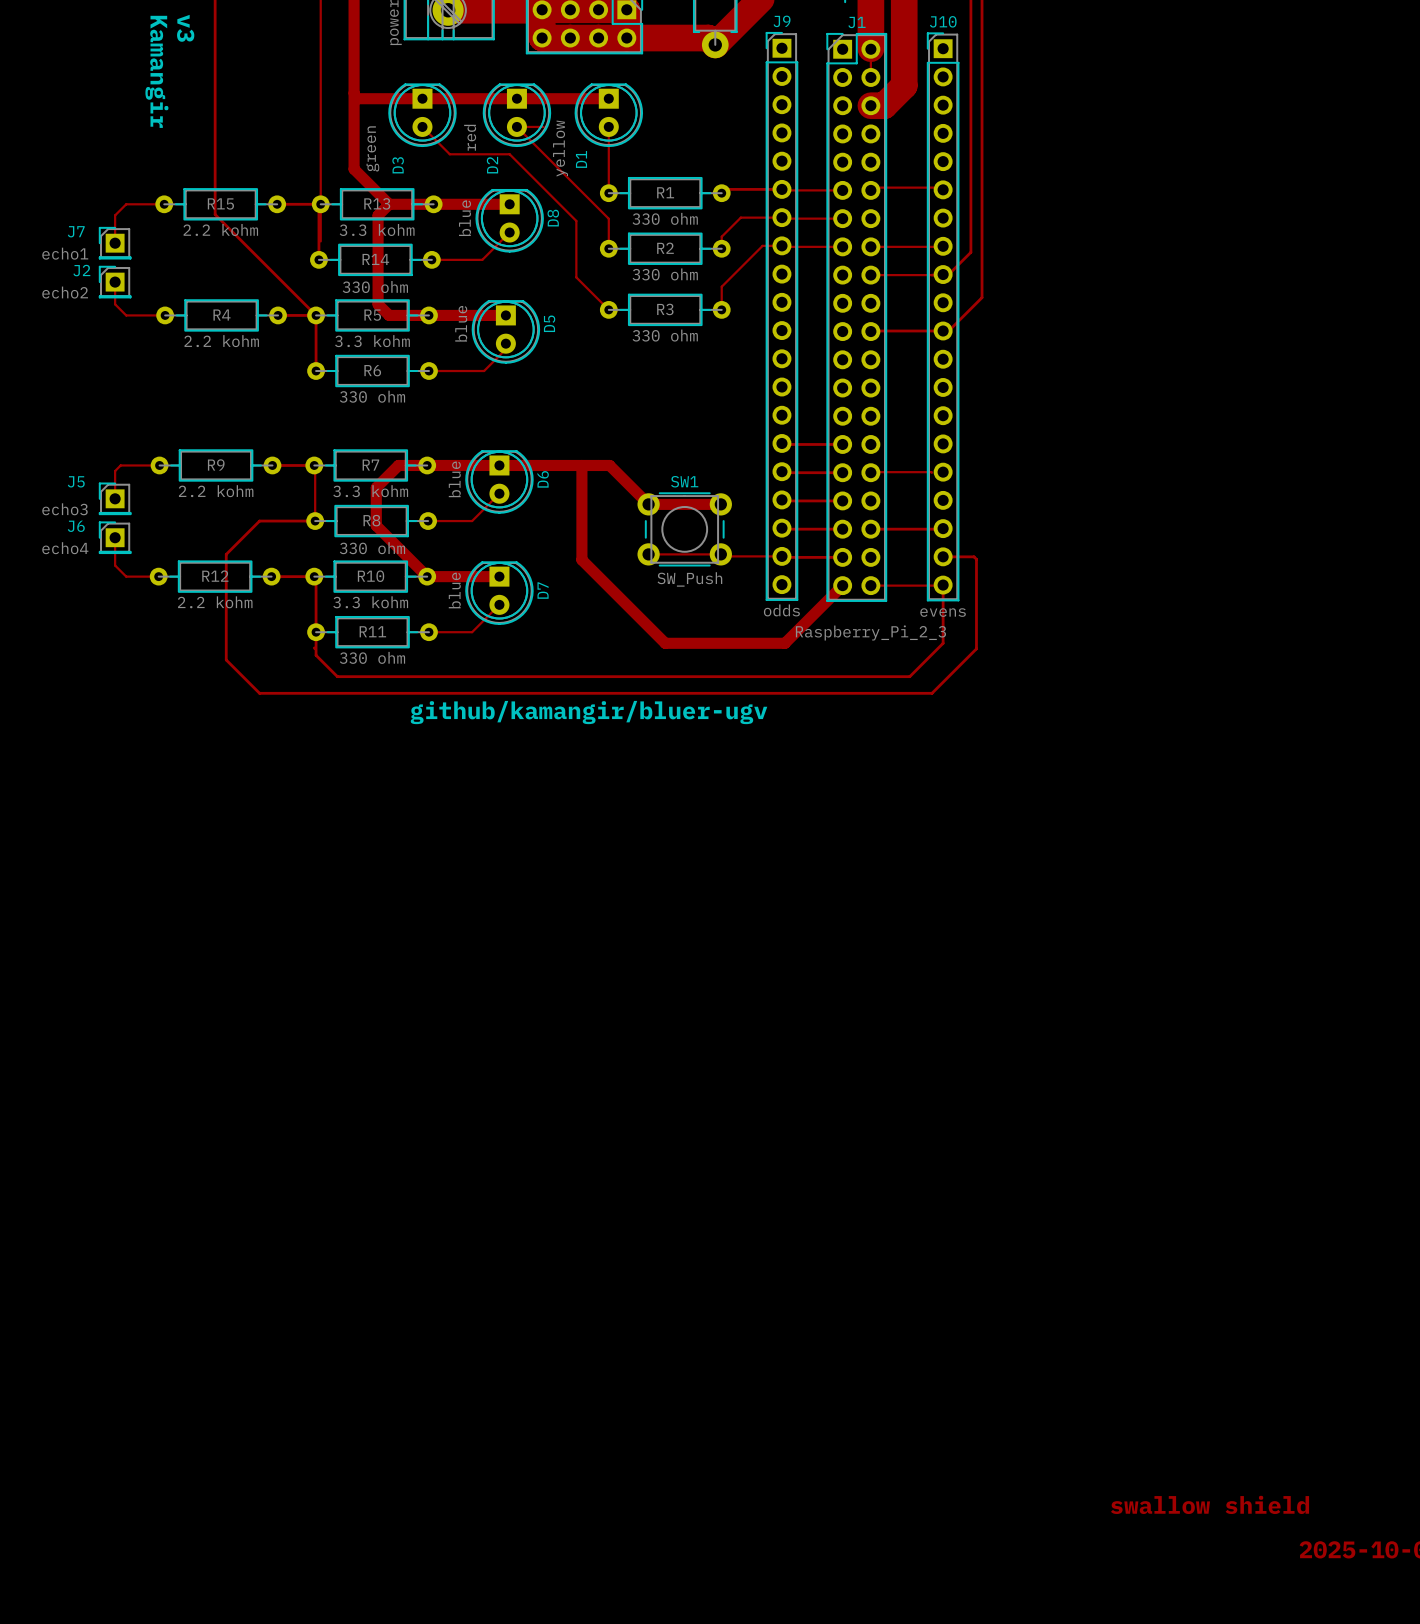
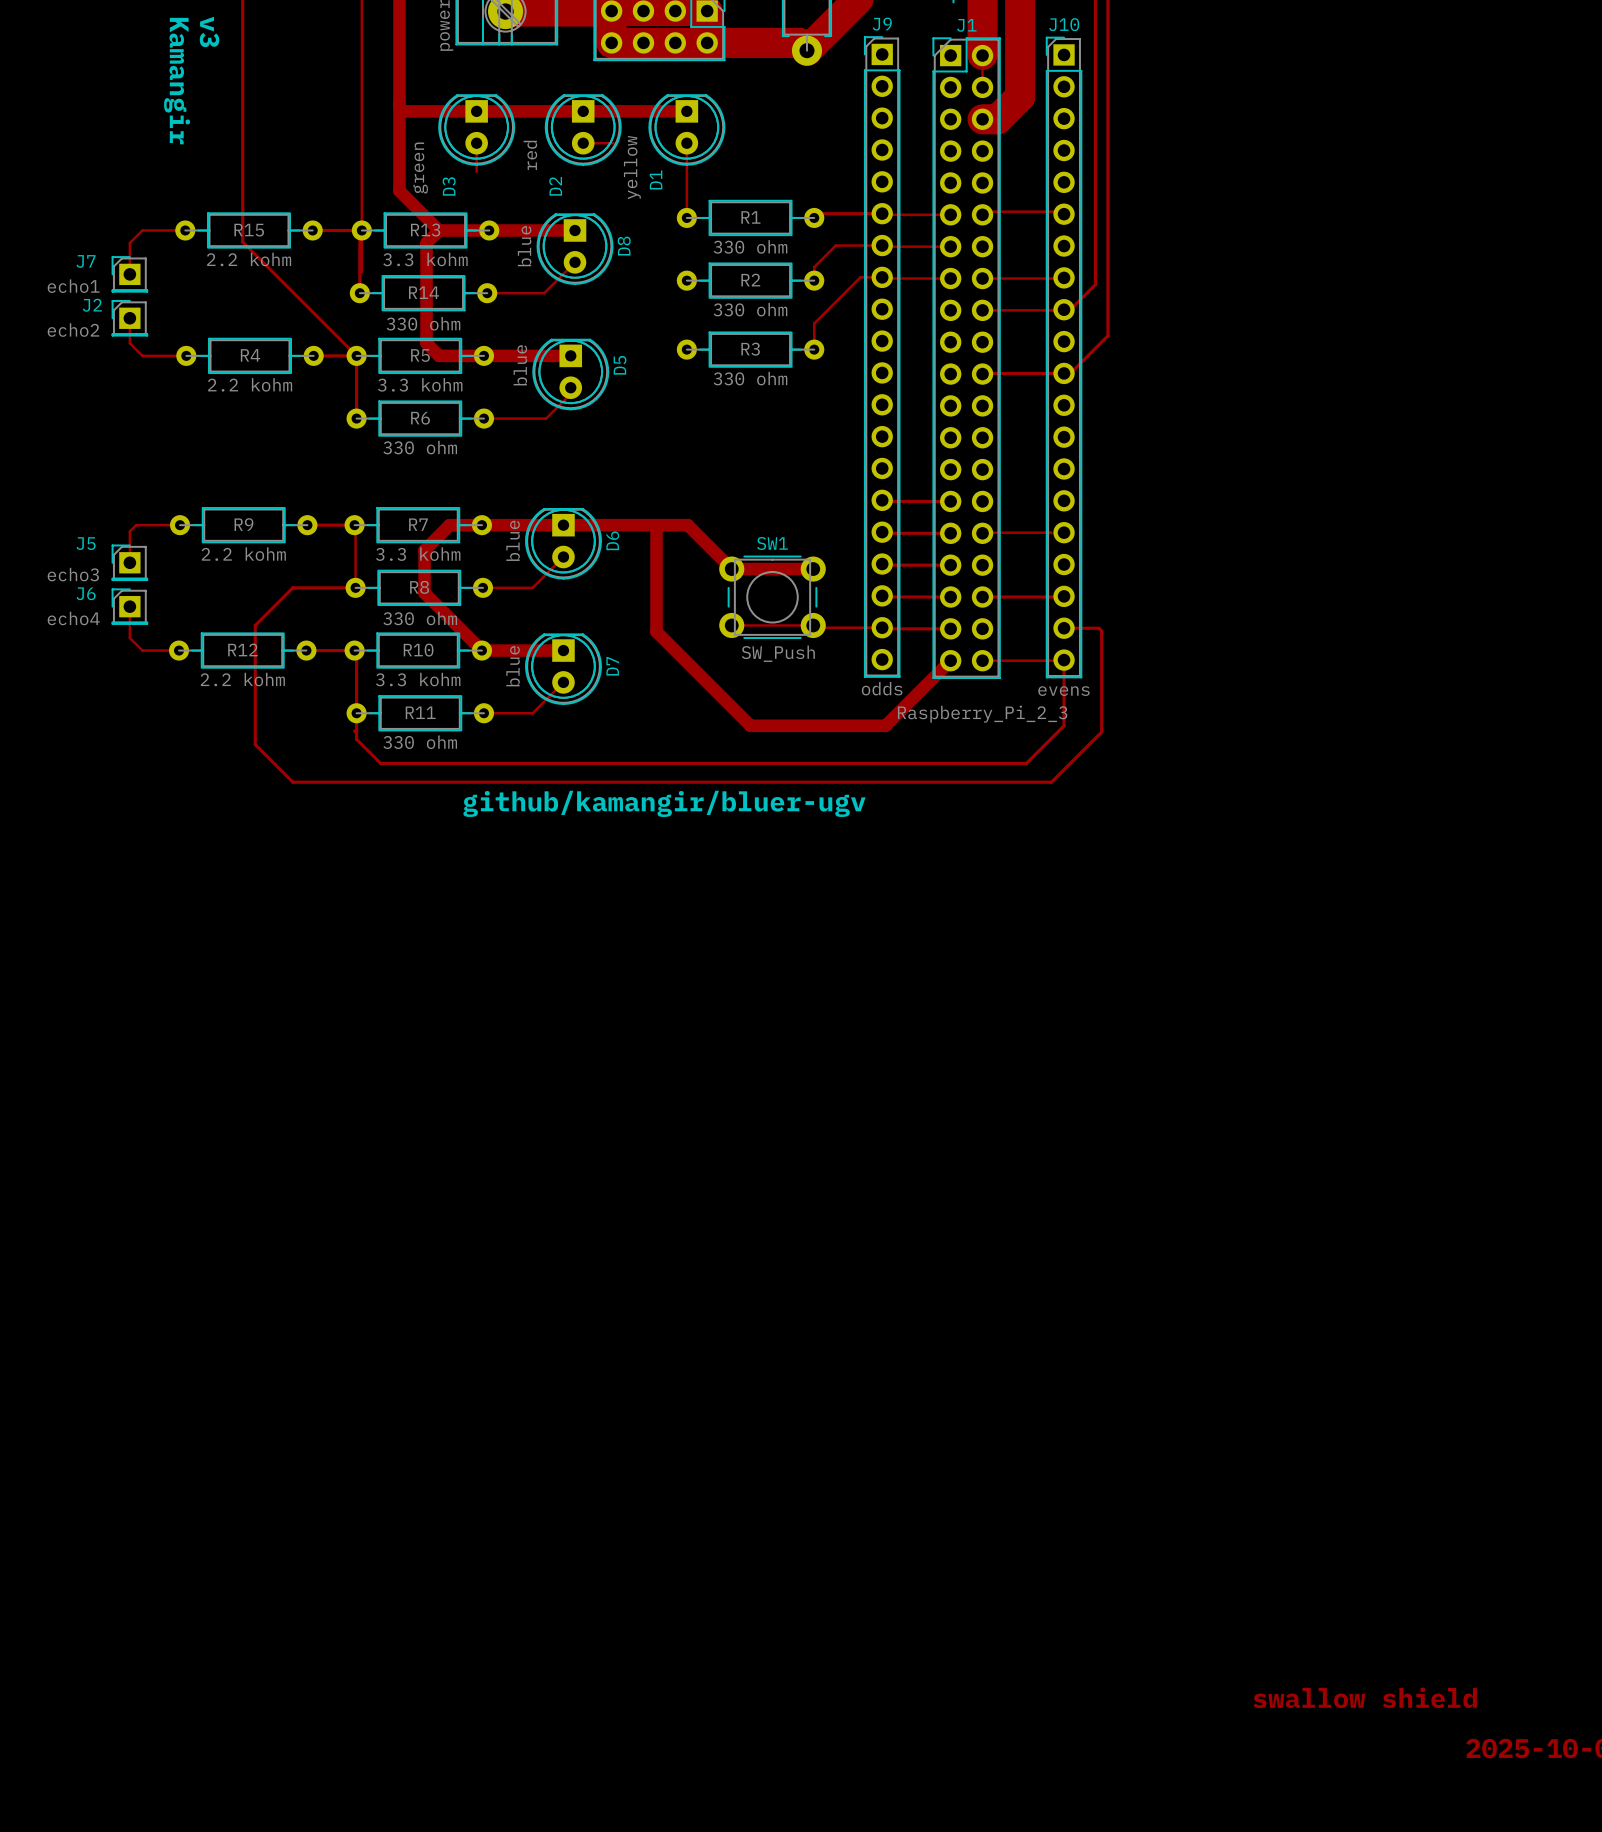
top track: (422, 126) (449, 154) (509, 154) (576, 220) (576, 277) (608, 309) -> (476, 143) (476, 171)
top track: (516, 126) (608, 218) (608, 248) -> none

